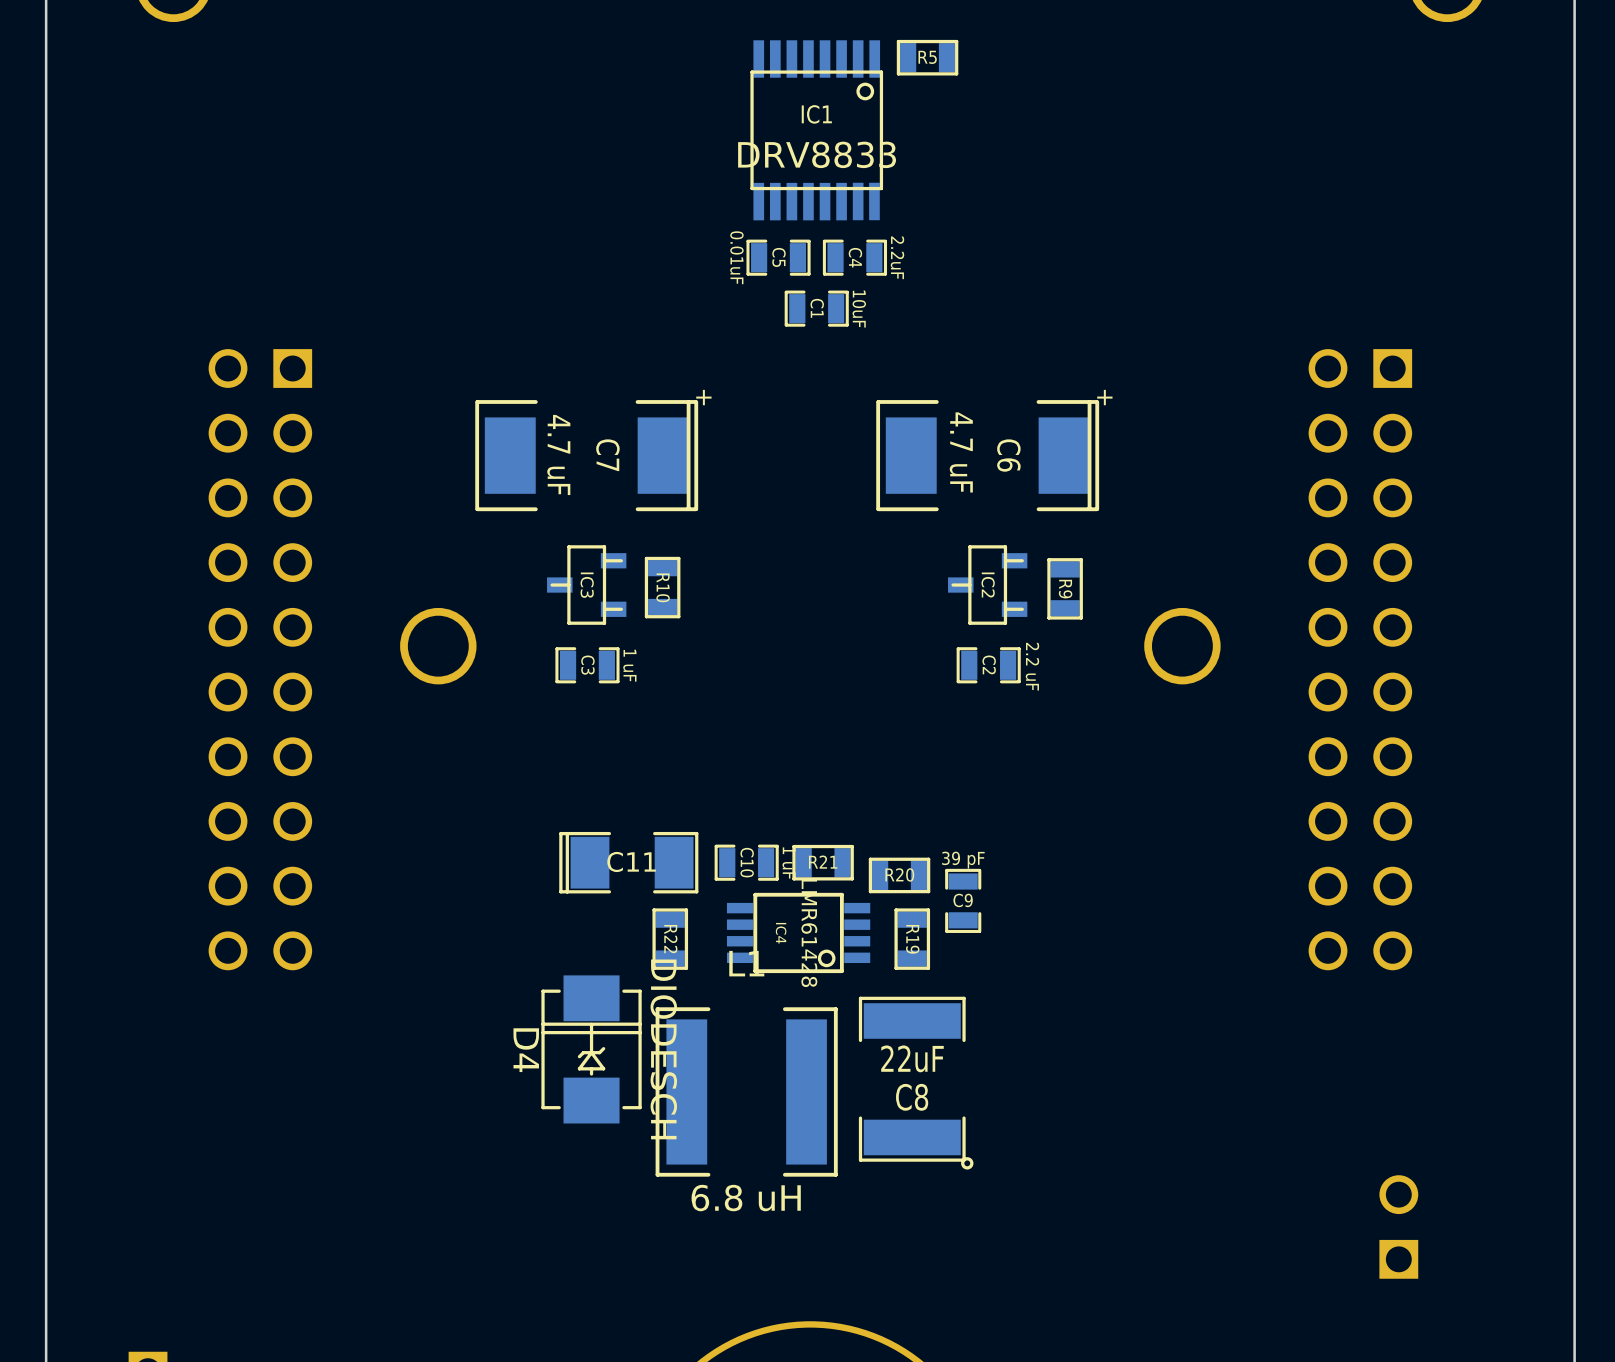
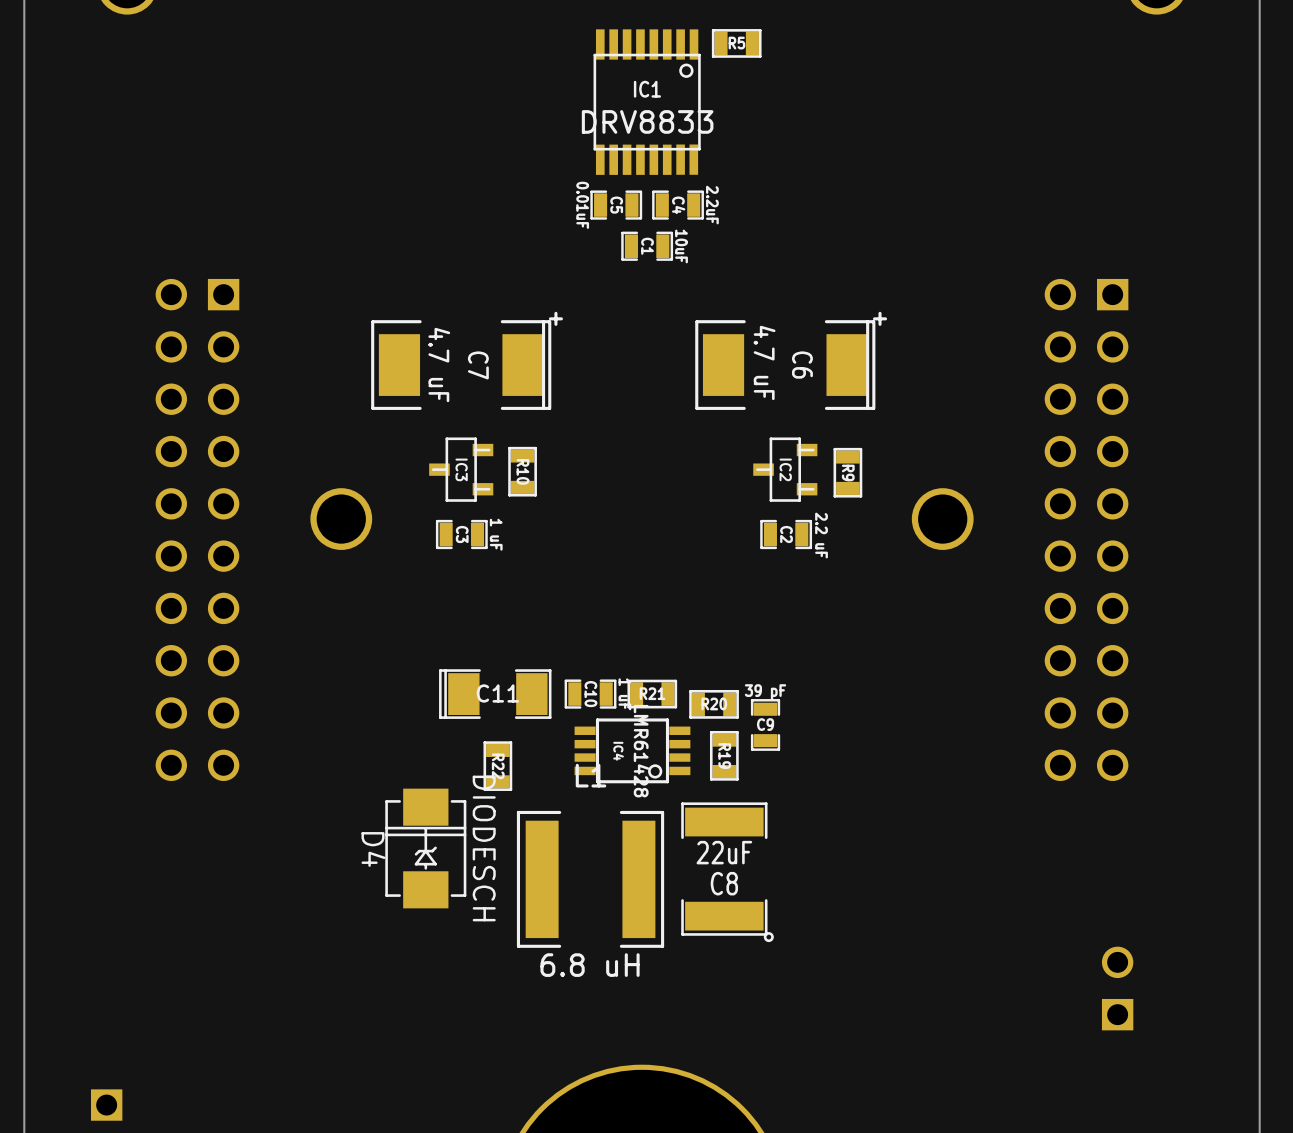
R22 position: (670, 939) -> (497, 766)
D4 position: (591, 1049) -> (425, 848)

